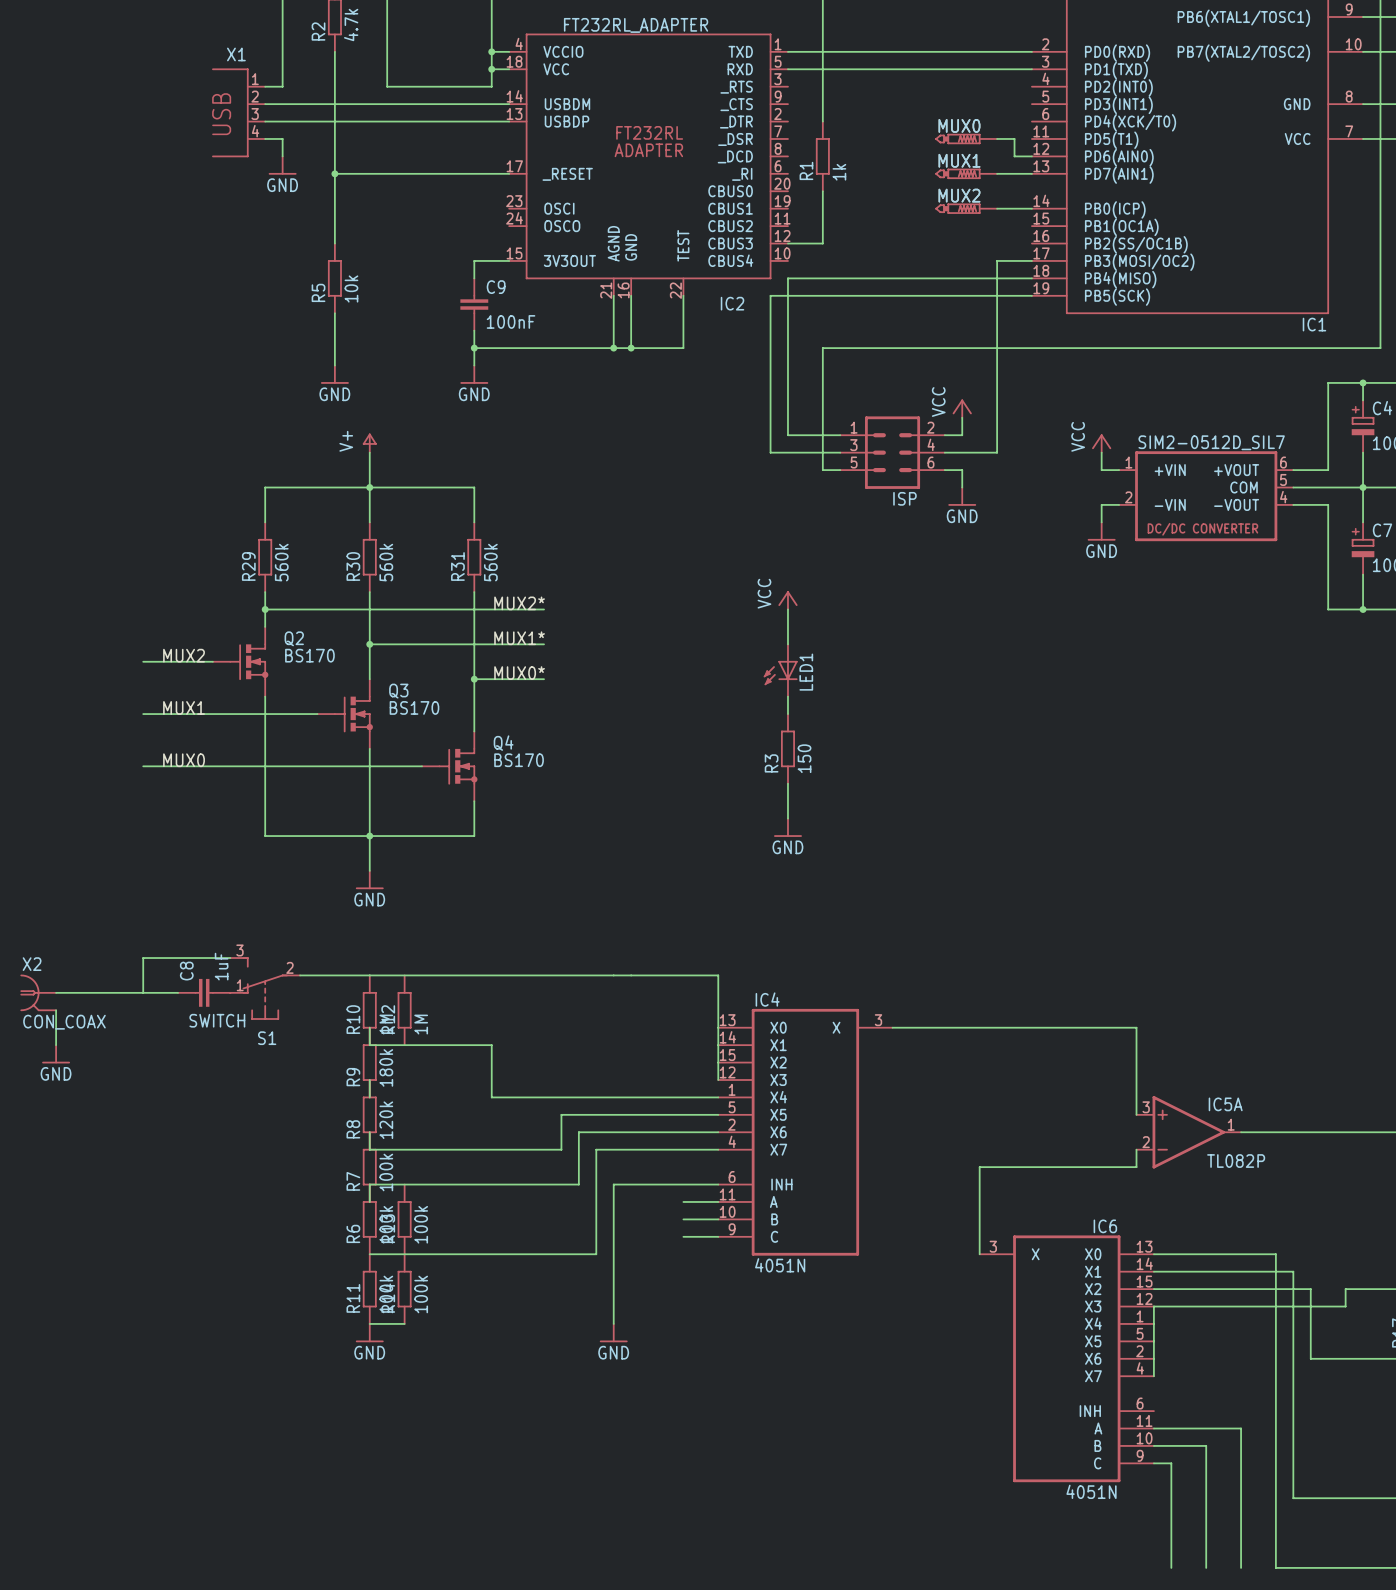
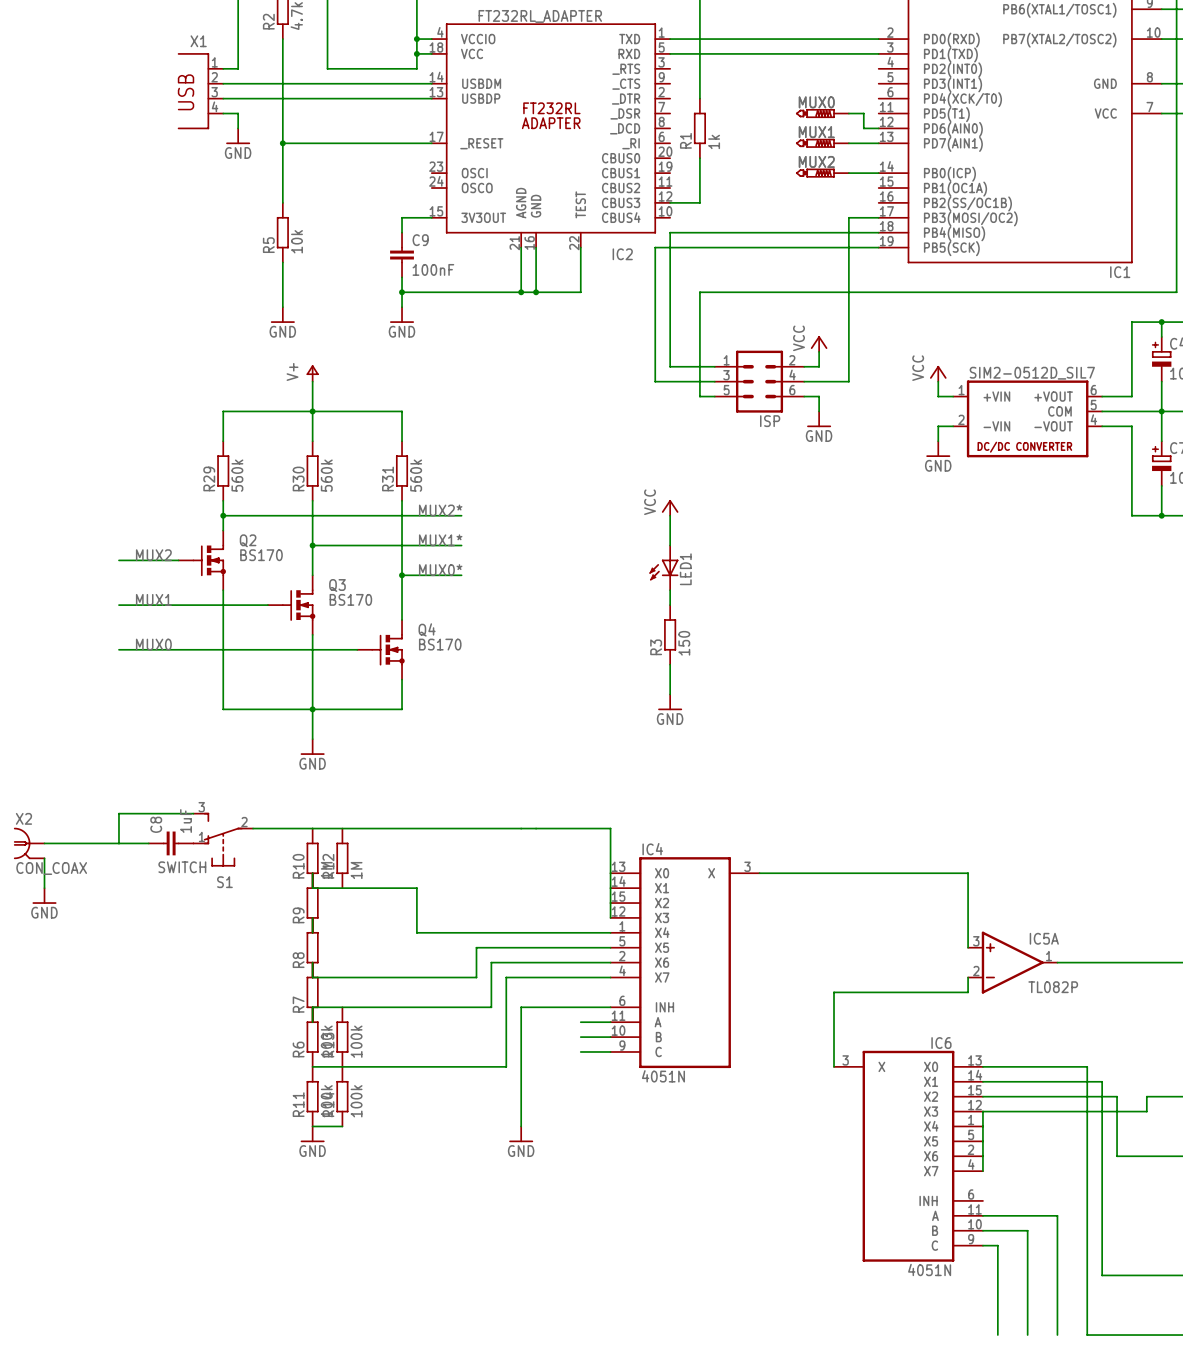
R9 value: 180k (386, 1067) -> none
R8 value: 120k (386, 1120) -> none
R7 value: 100k (386, 1172) -> none

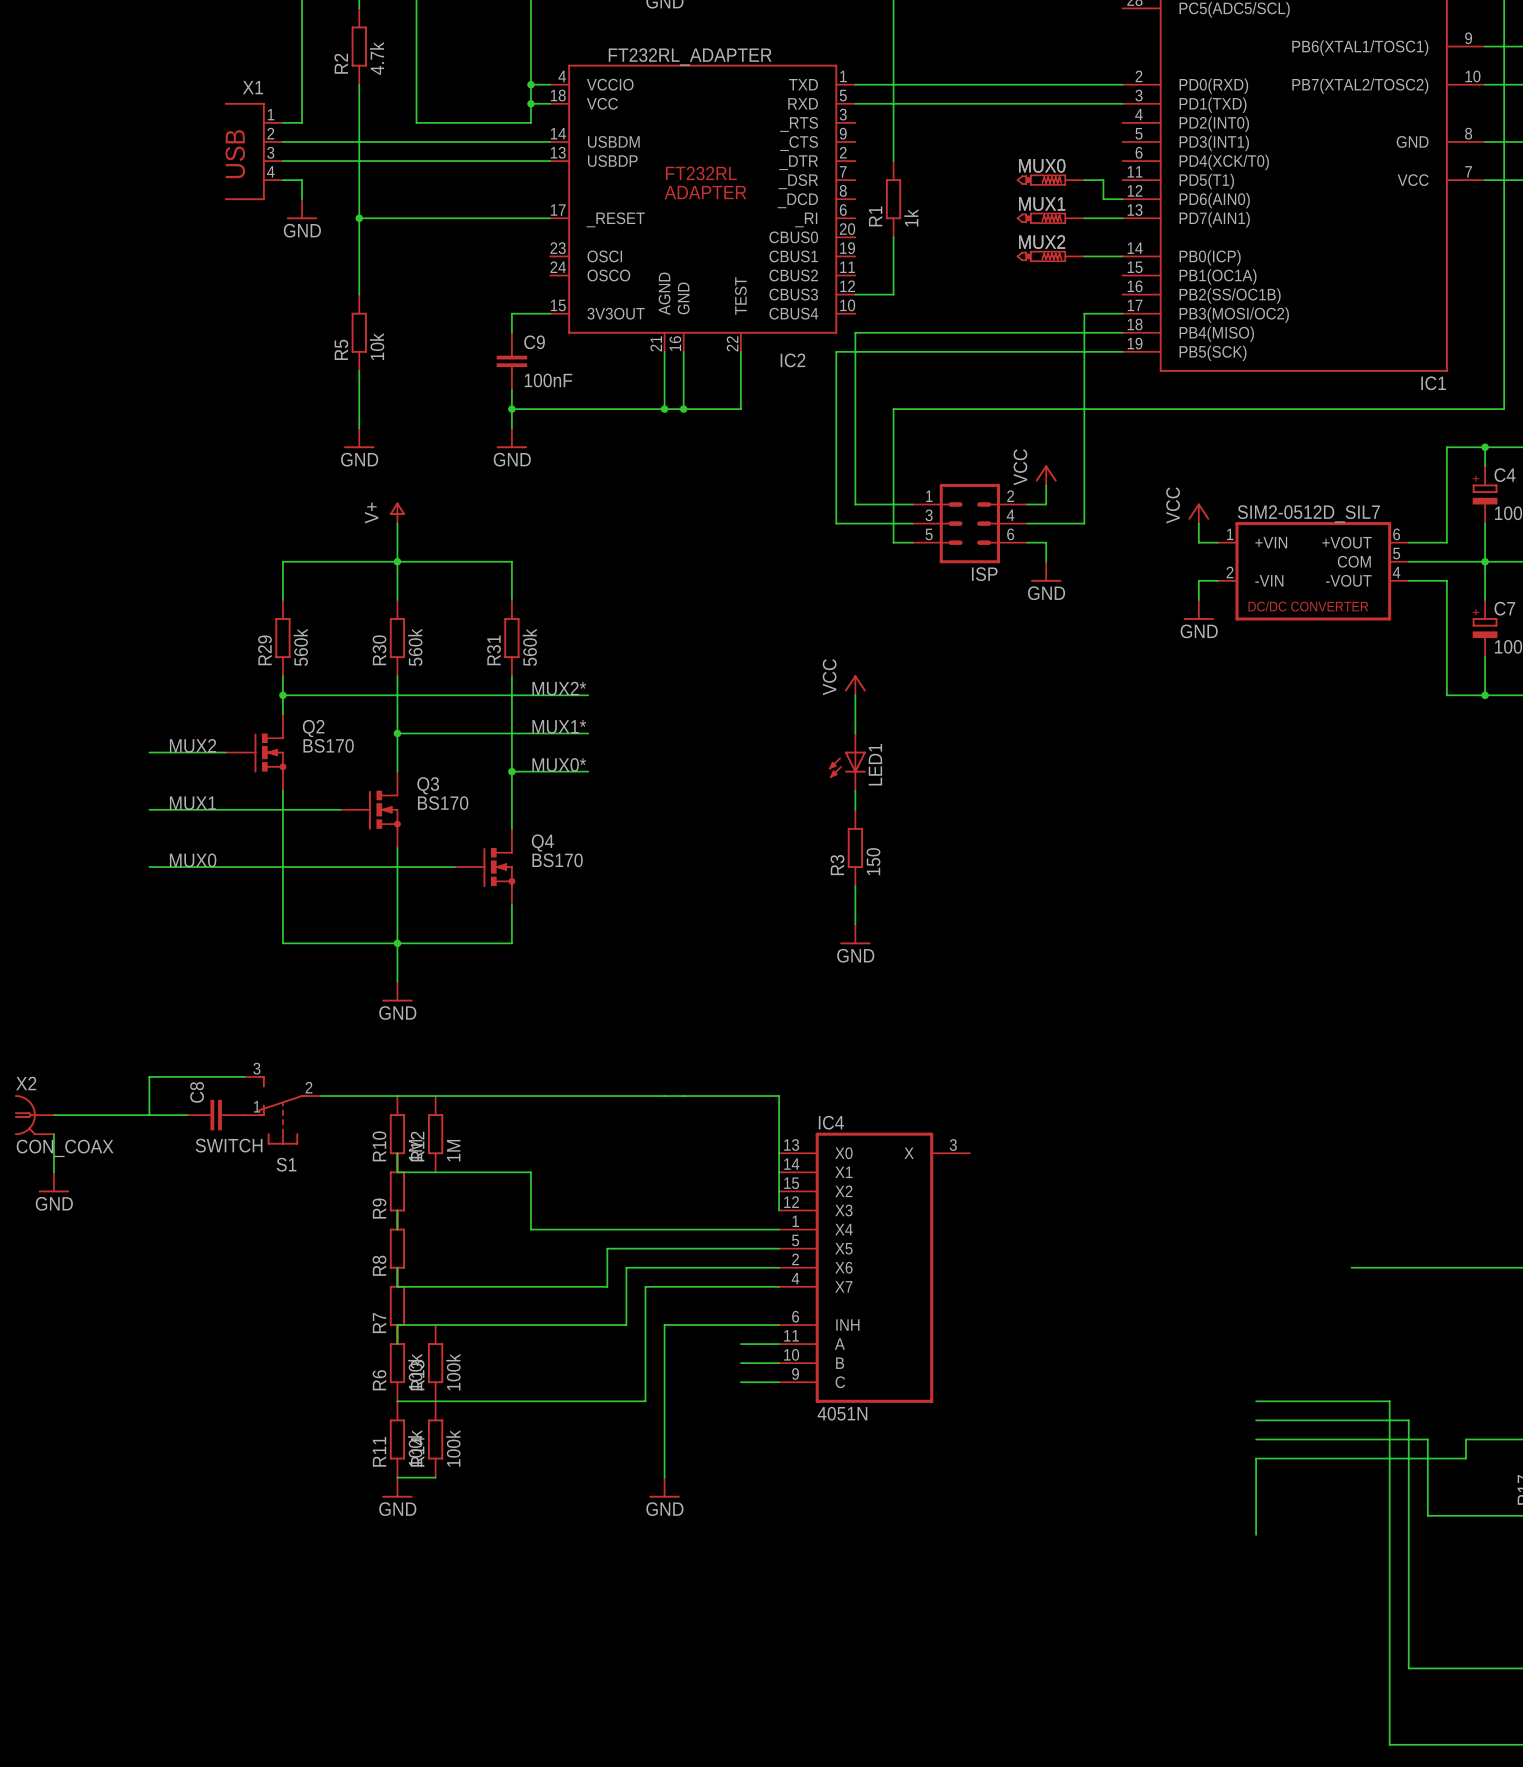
C8 value: 1uF (186, 820) -> none
wire: (759, 873) (968, 873) (968, 947) -> none
IC5A: TL082P (1012, 962) -> none
wire: (968, 977) (968, 992) (834, 992) (834, 1066) -> none
IC6: 4051N (908, 1156) -> none
wire: (982, 1215) (1057, 1215) (1057, 1335) -> none
wire: (982, 1230) (1027, 1230) (1027, 1335) -> none
wire: (982, 1245) (997, 1245) (997, 1335) -> none

